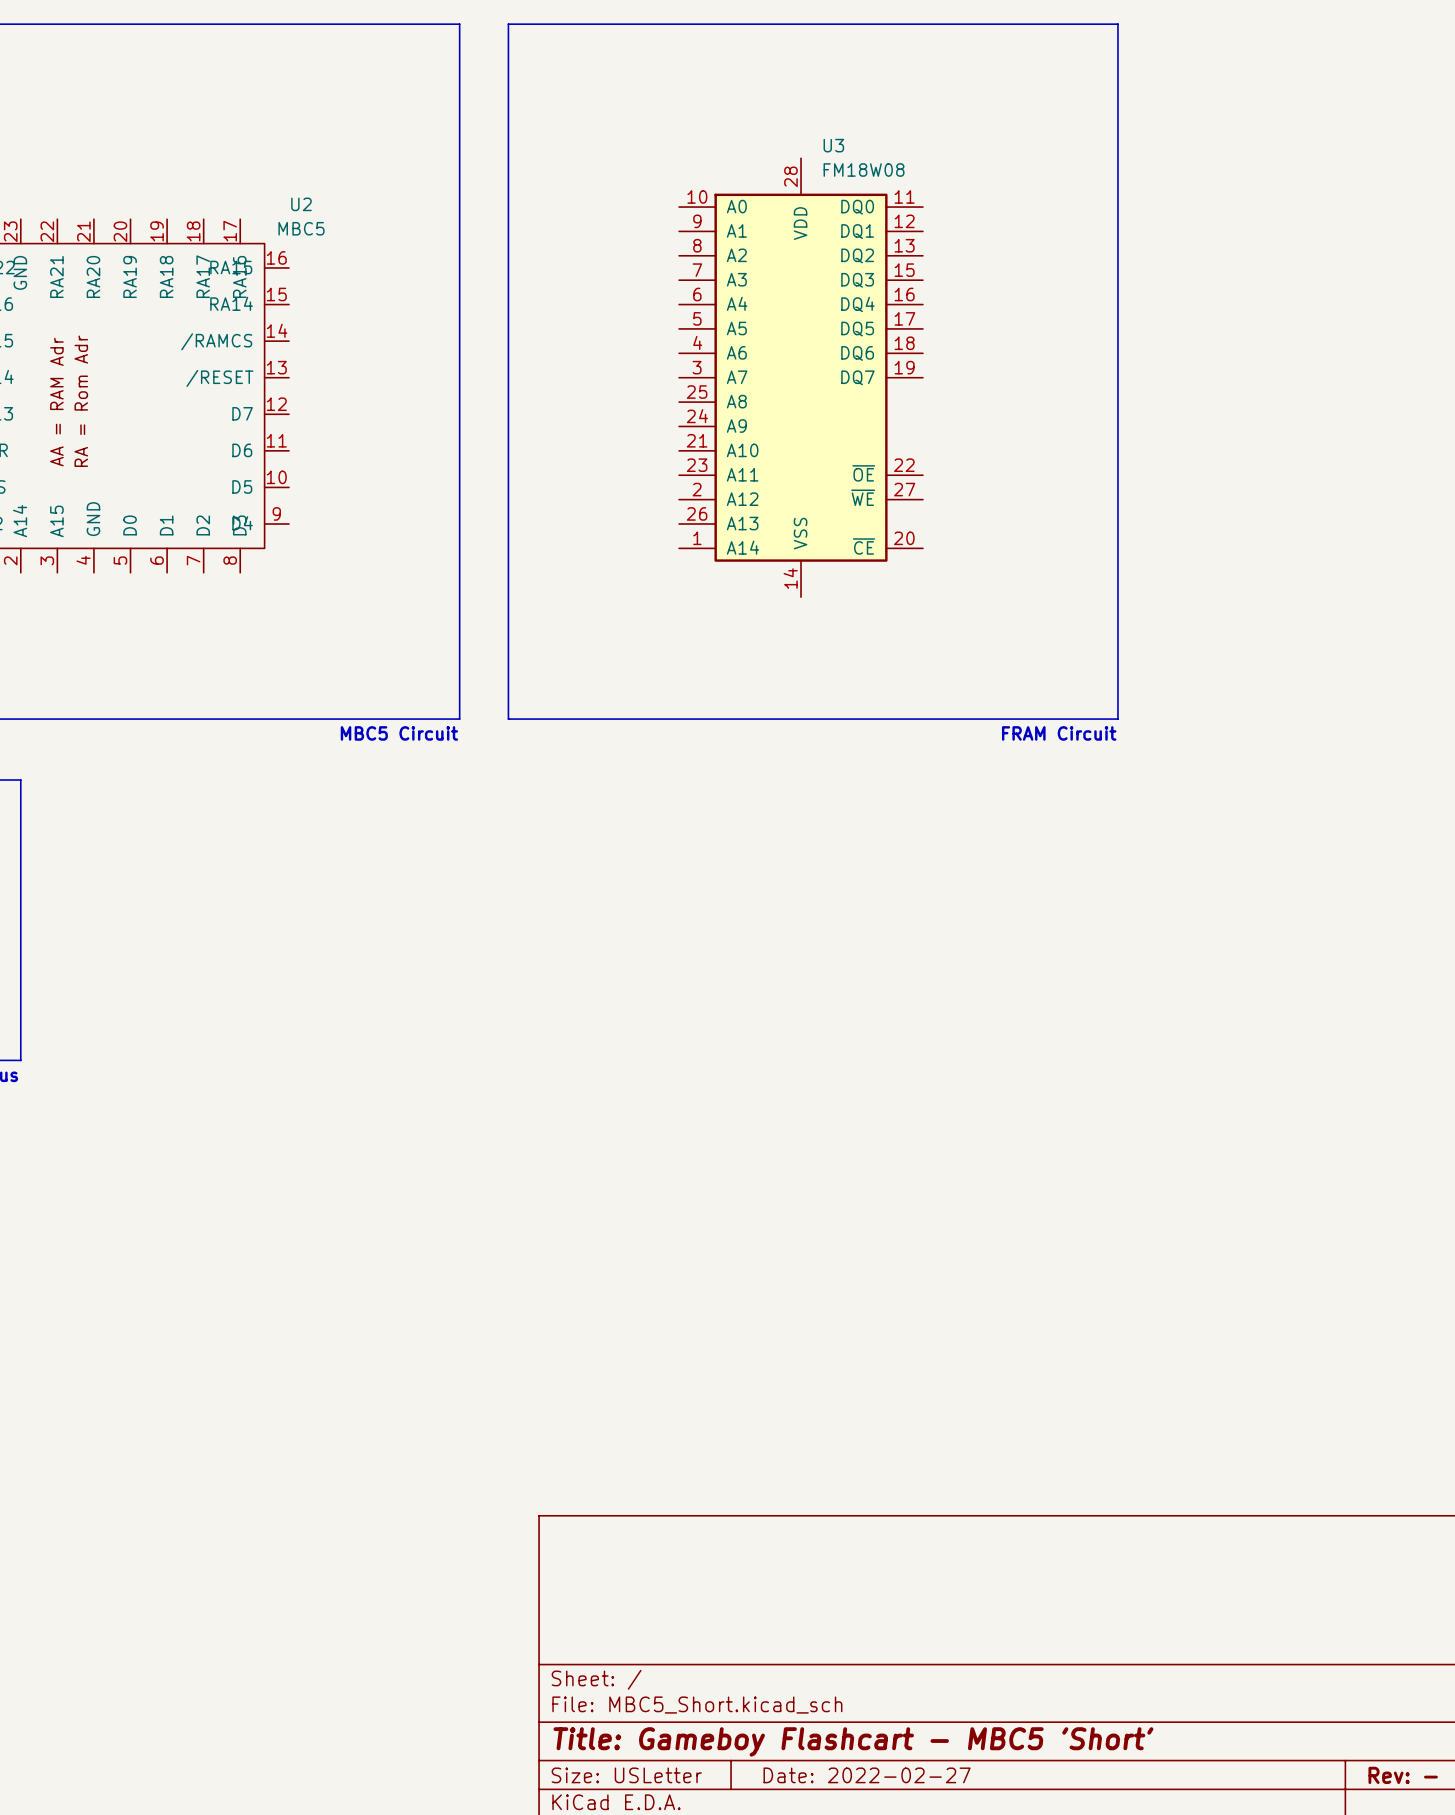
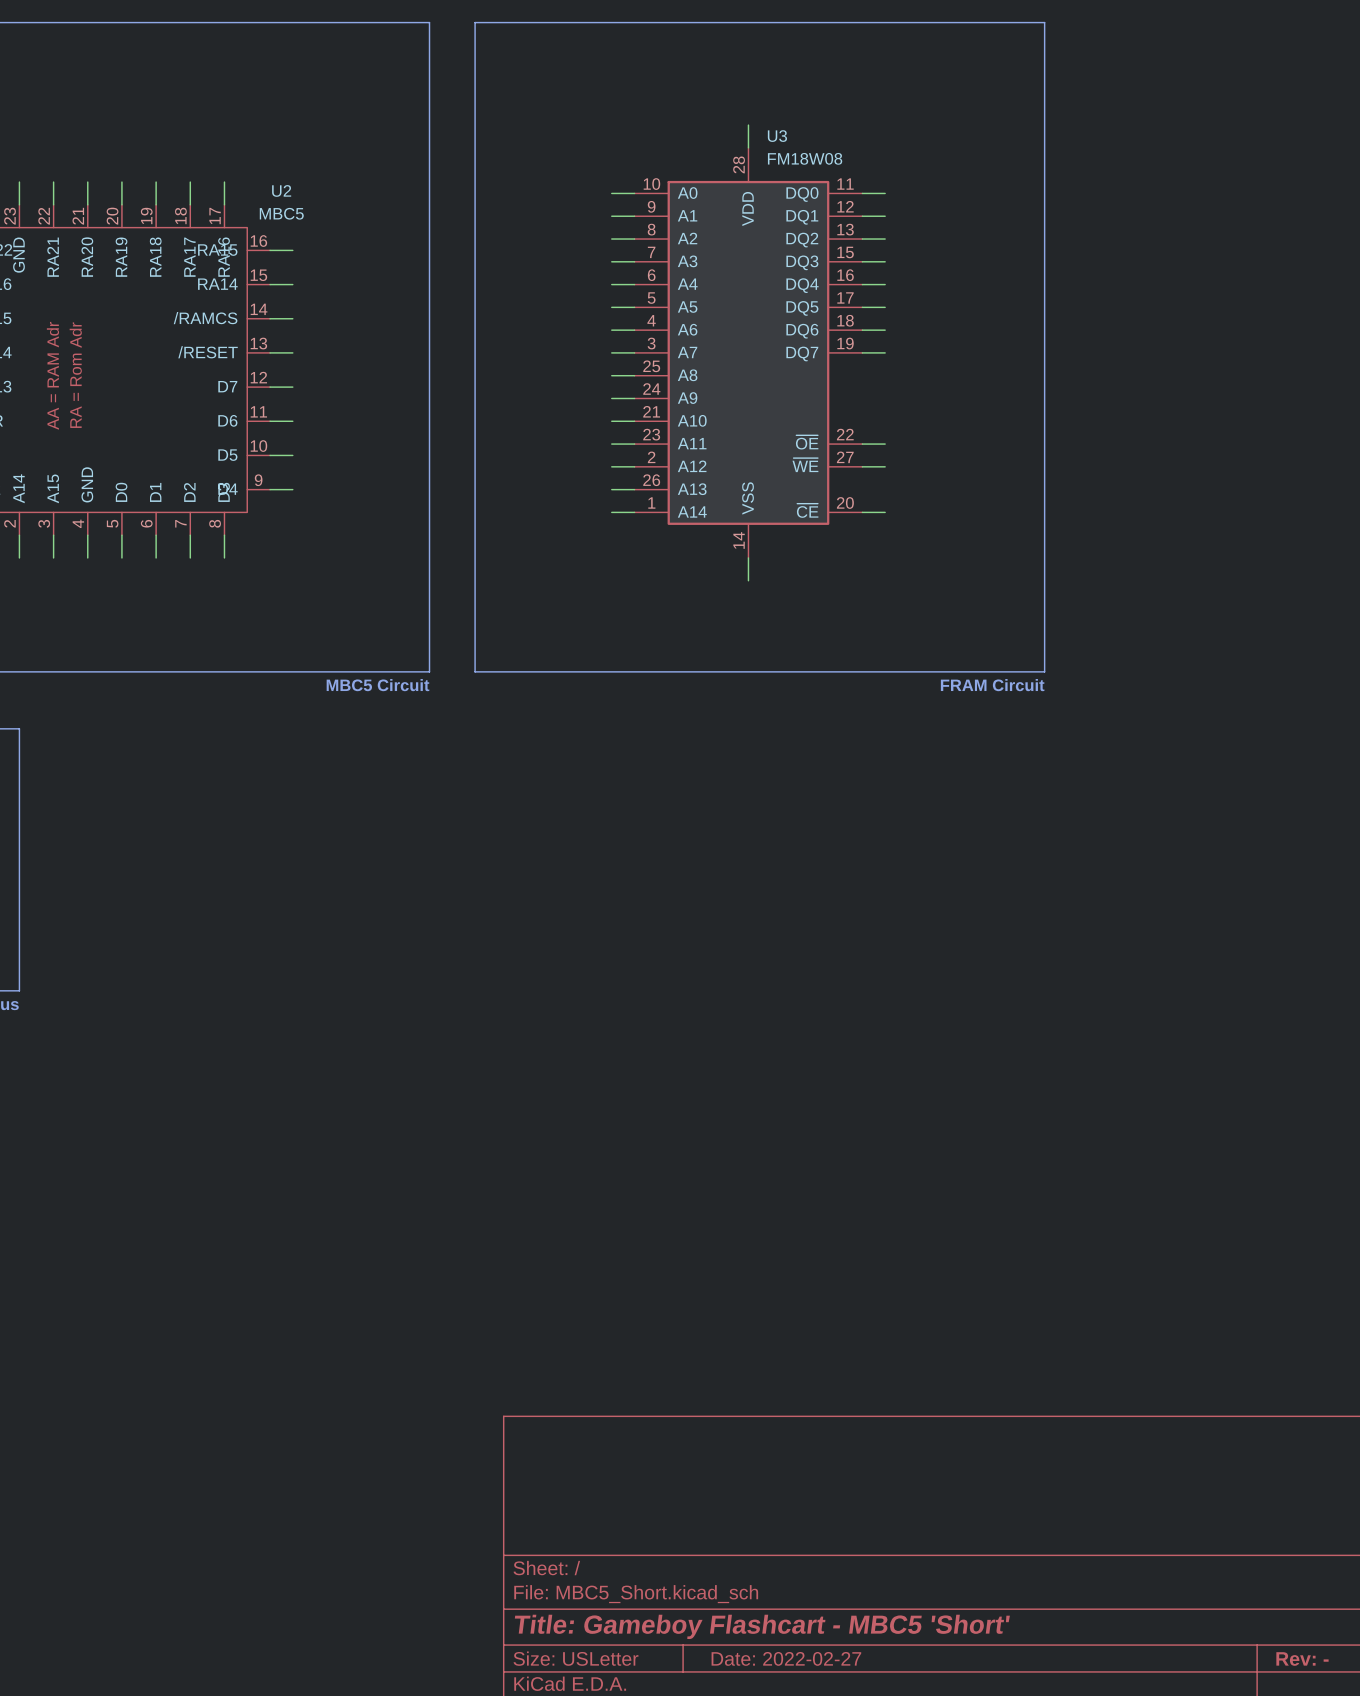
wire: none -> (748, 125) (748, 147)
wire: none -> (19, 182) (19, 204)
wire: none -> (53, 182) (53, 204)
wire: none -> (87, 182) (87, 204)
wire: none -> (121, 182) (121, 204)
wire: none -> (156, 182) (156, 204)
wire: none -> (190, 182) (190, 204)
wire: none -> (224, 182) (224, 204)
wire: none -> (611, 193) (634, 193)
wire: none -> (862, 193) (885, 193)
wire: none -> (611, 216) (634, 216)
wire: none -> (862, 216) (885, 216)
wire: none -> (611, 239) (634, 239)
wire: none -> (862, 239) (885, 239)
wire: none -> (270, 250) (292, 250)
wire: none -> (611, 261) (634, 261)
wire: none -> (862, 261) (885, 261)
wire: none -> (270, 284) (292, 284)
wire: none -> (611, 284) (634, 284)
wire: none -> (862, 284) (885, 284)
wire: none -> (611, 307) (634, 307)
wire: none -> (862, 307) (885, 307)
wire: none -> (270, 318) (292, 318)
wire: none -> (611, 330) (634, 330)
wire: none -> (862, 330) (885, 330)
wire: none -> (270, 352) (292, 352)
wire: none -> (611, 352) (634, 352)
wire: none -> (862, 352) (885, 352)
wire: none -> (611, 375) (634, 375)
wire: none -> (270, 387) (292, 387)
wire: none -> (611, 398) (634, 398)
wire: none -> (270, 421) (292, 421)
wire: none -> (611, 421) (634, 421)
wire: none -> (611, 444) (634, 444)
wire: none -> (862, 444) (885, 444)
wire: none -> (270, 455) (292, 455)
wire: none -> (611, 466) (634, 466)
wire: none -> (862, 466) (885, 466)
wire: none -> (270, 489) (292, 489)
wire: none -> (611, 489) (634, 489)
wire: none -> (611, 512) (634, 512)
wire: none -> (862, 512) (885, 512)
wire: none -> (19, 535) (19, 557)
wire: none -> (53, 535) (53, 557)
wire: none -> (87, 535) (87, 557)
wire: none -> (121, 535) (121, 557)
wire: none -> (156, 535) (156, 557)
wire: none -> (190, 535) (190, 557)
wire: none -> (224, 535) (224, 557)
wire: none -> (748, 557) (748, 580)

